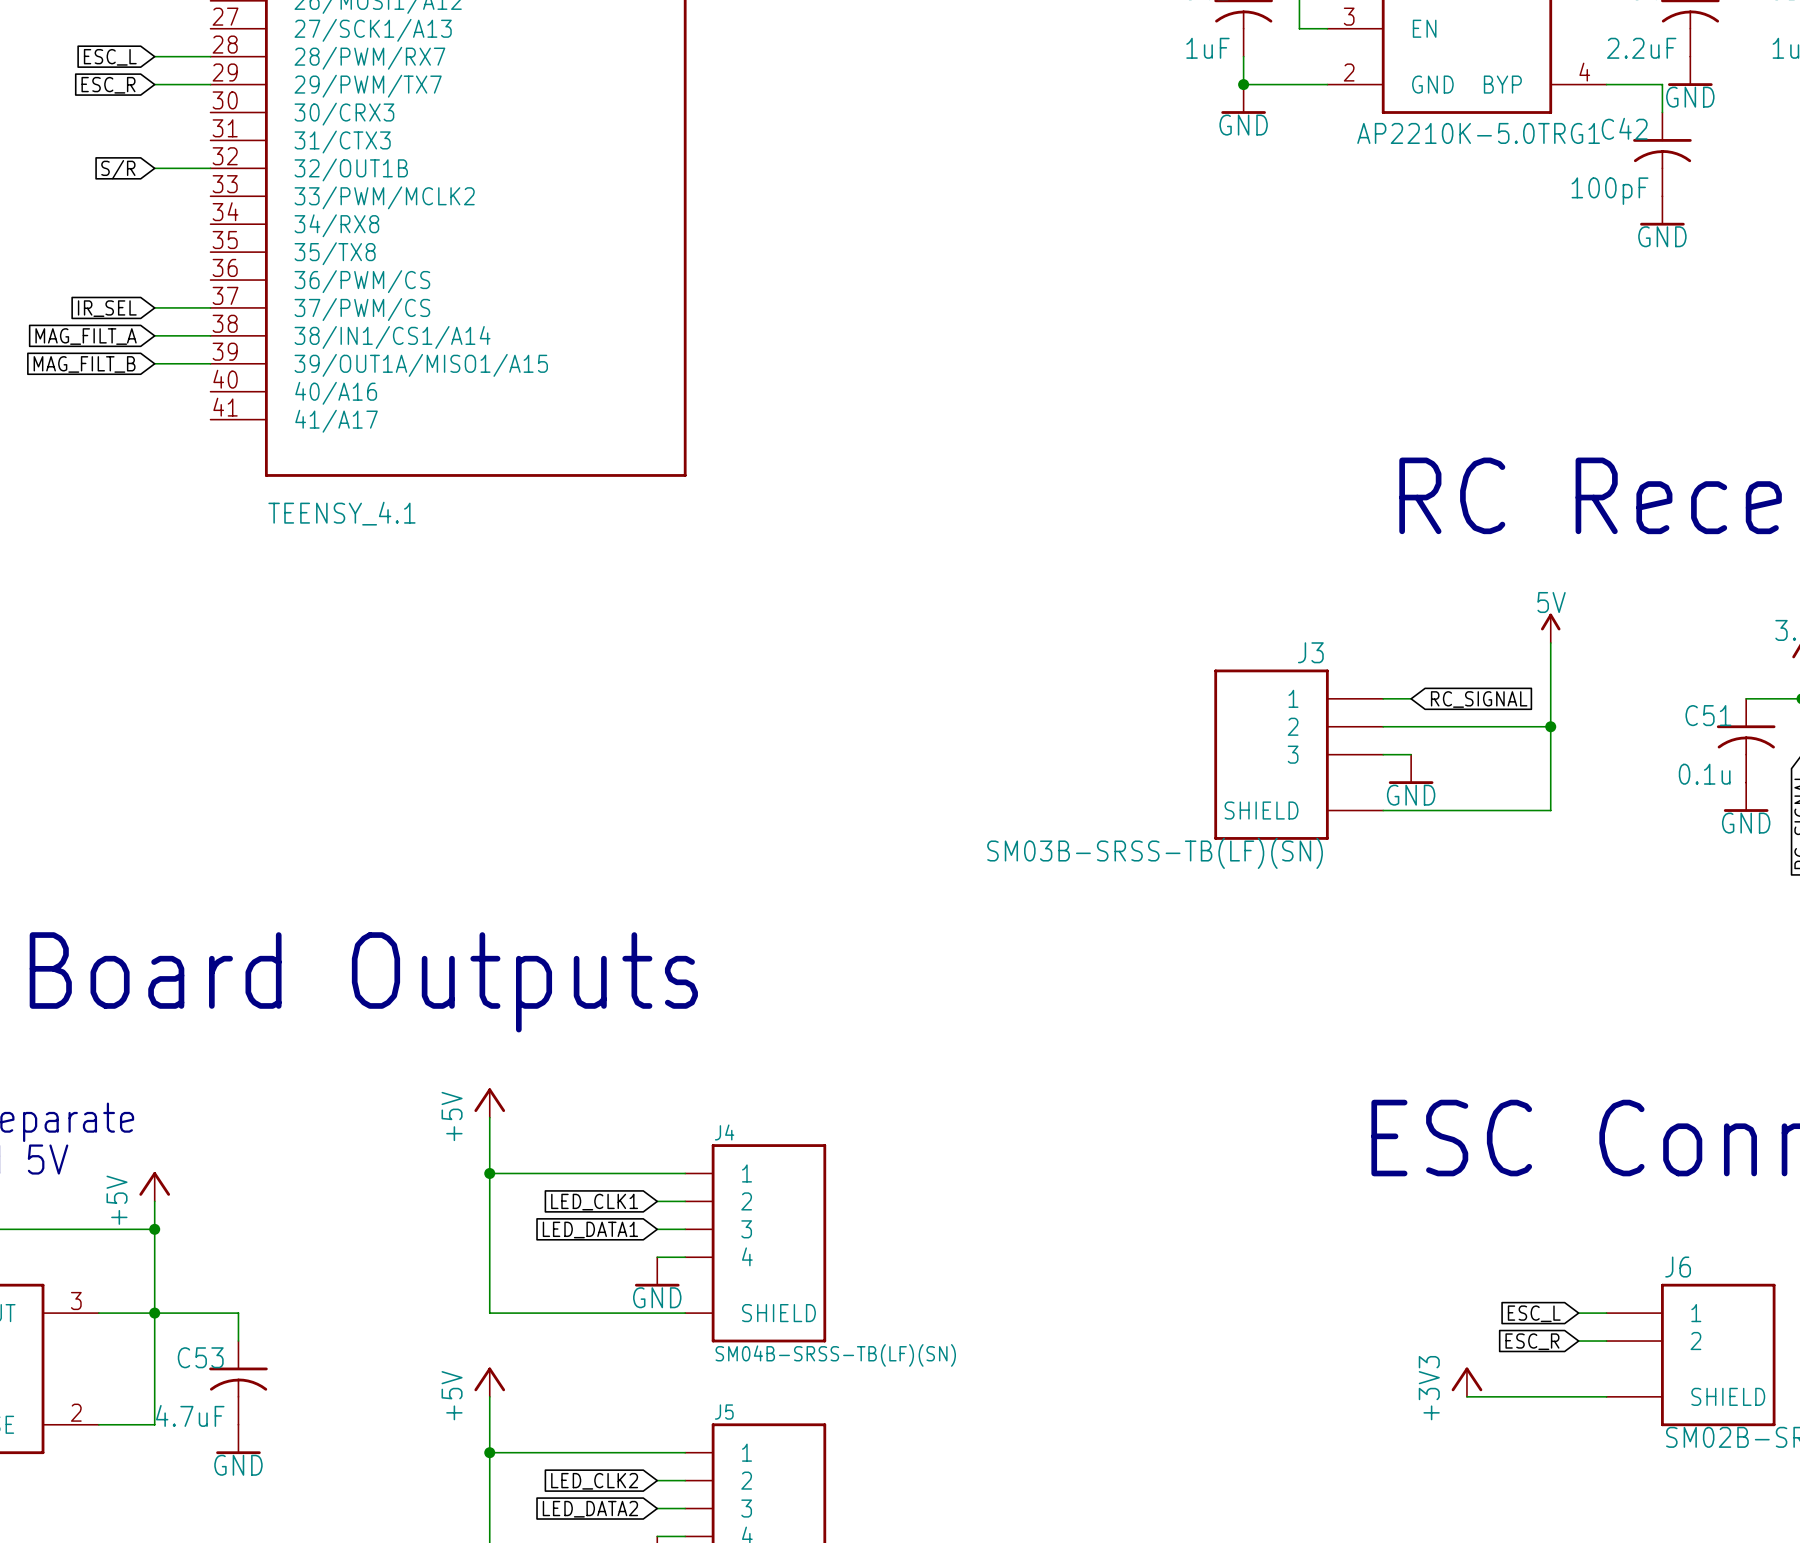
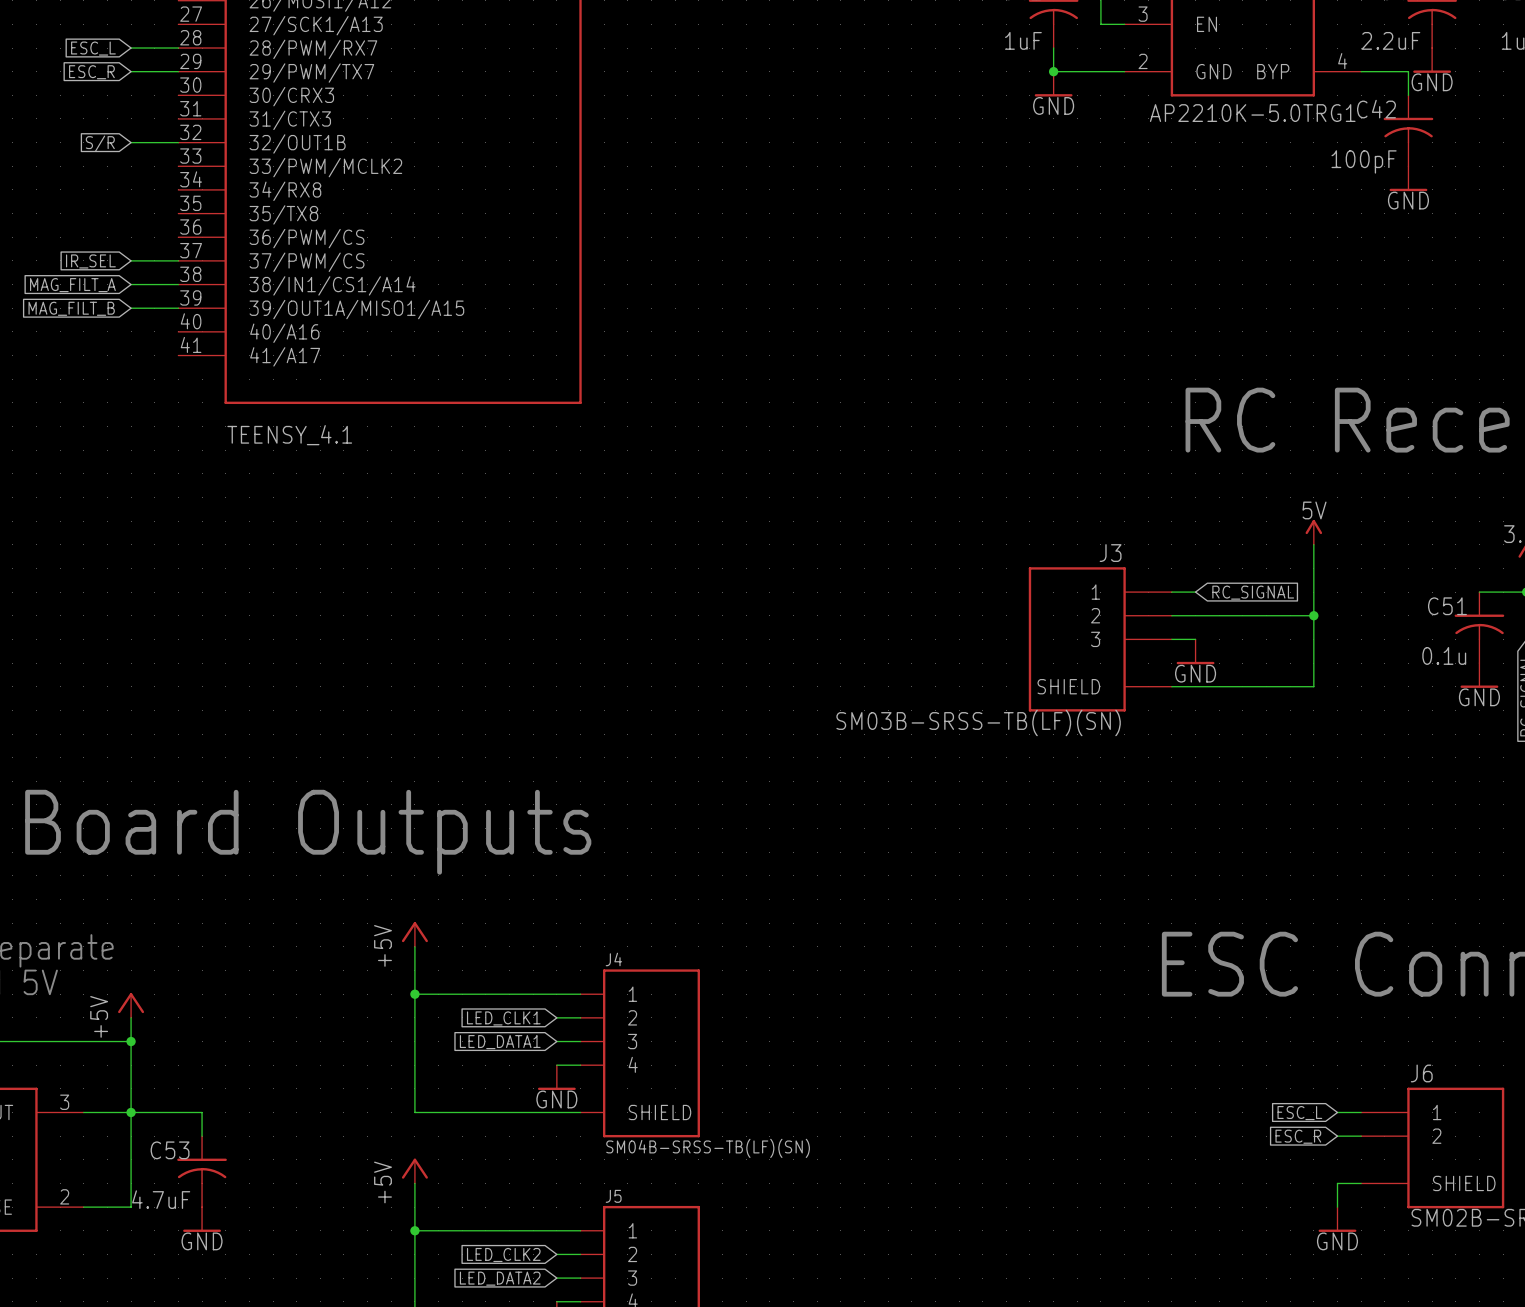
power symbol: +3V3 (1466, 1382) -> none
wire: (1466, 1396) (1578, 1396) -> (1337, 1207) (1337, 1183)
power symbol: none -> GND (1337, 1219)

